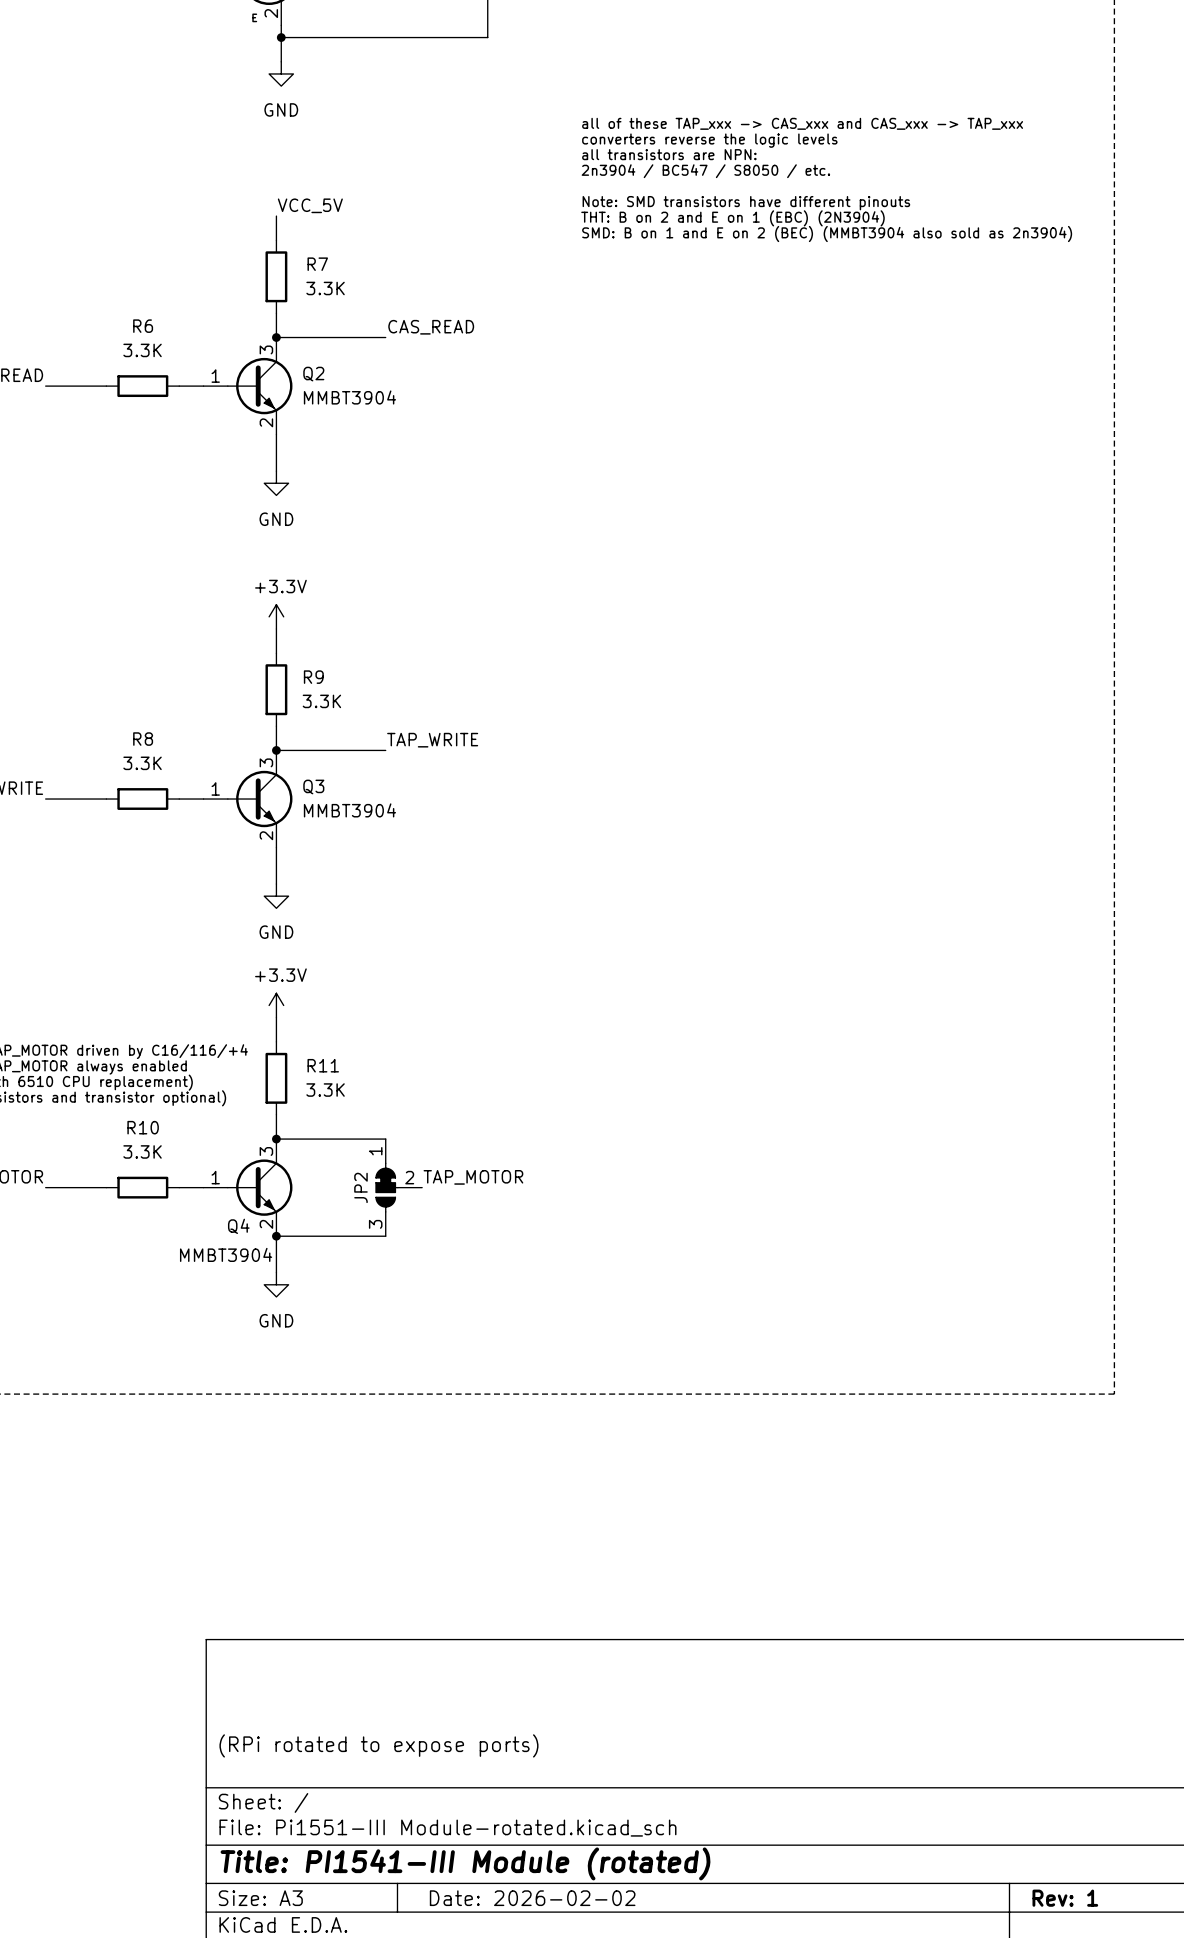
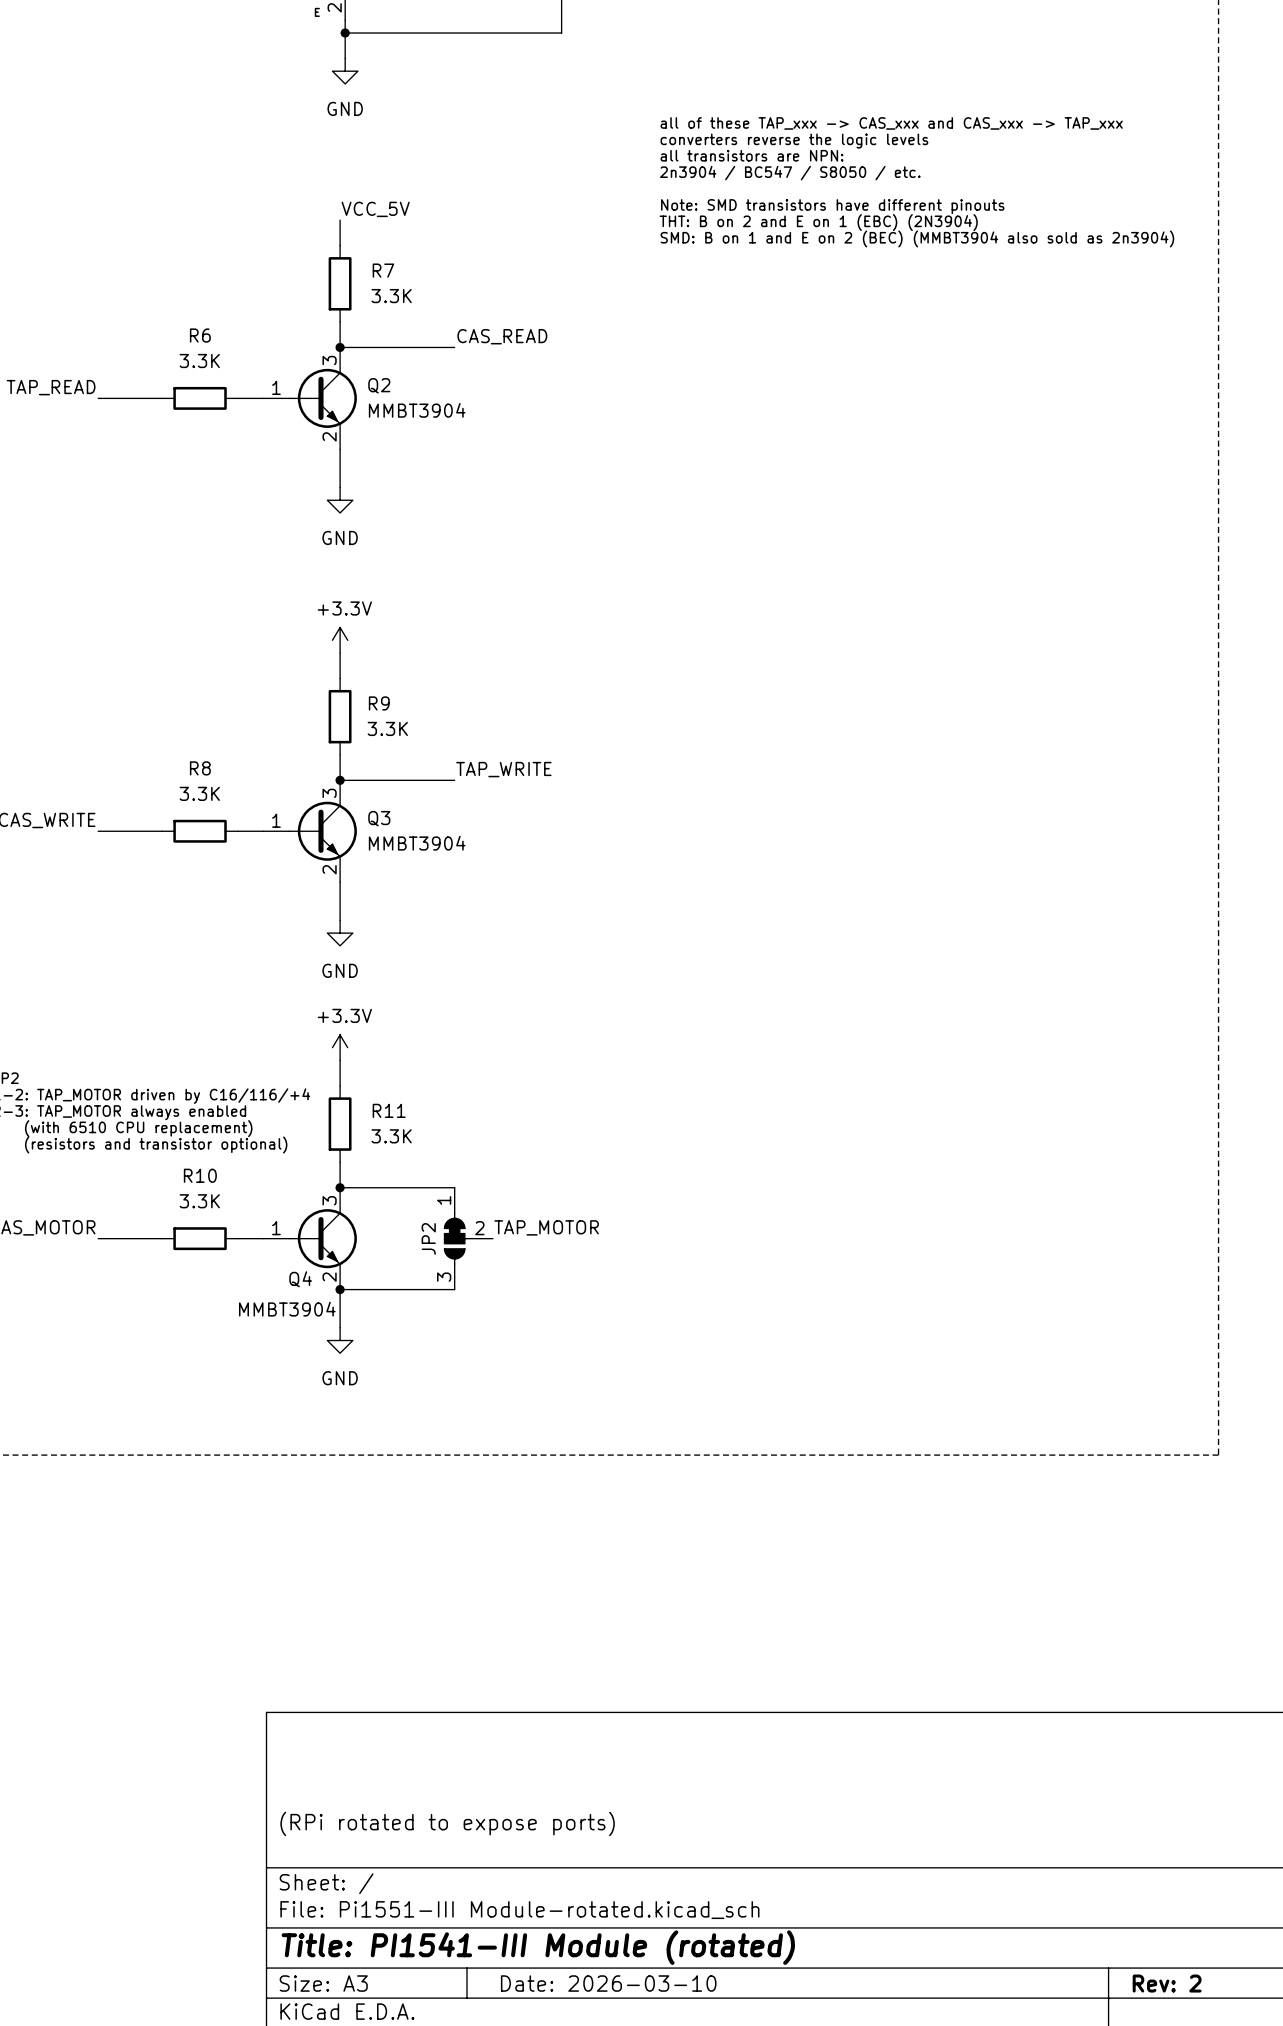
title block: Date: 2026-02-02 (532, 1898) -> Date: 2026-03-10 (608, 1983)
title block: Rev: 1 (1065, 1898) -> Rev: 2 (1167, 1983)

